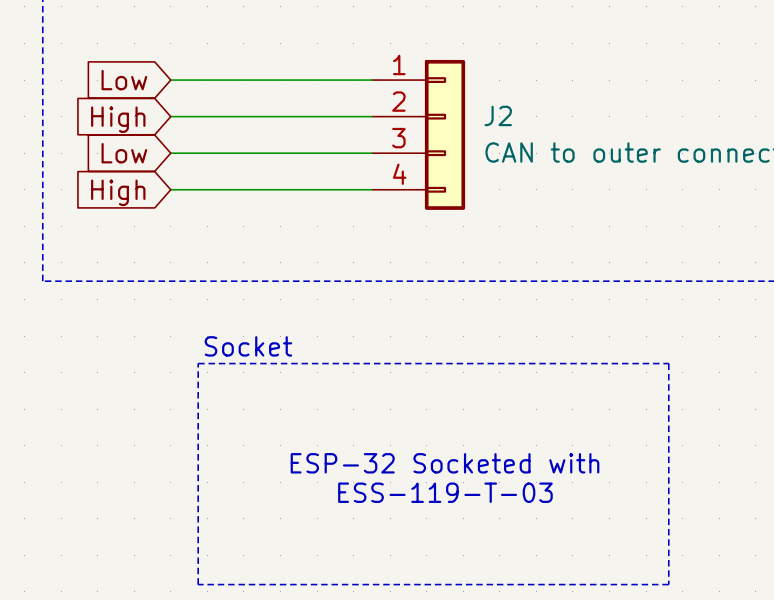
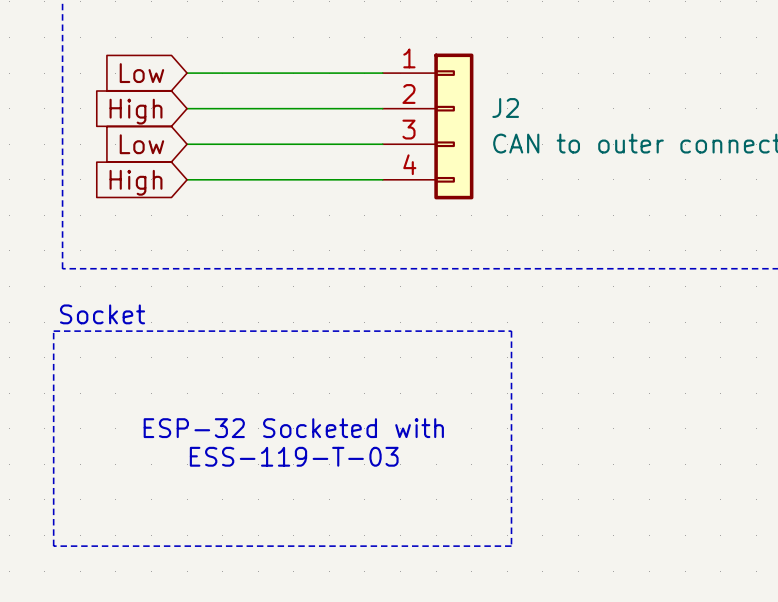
text position: Socket (248, 346) -> Socket (102, 314)
line: (198, 363) (668, 363) (668, 584) (198, 584) (198, 363) -> (53, 331) (511, 331) (511, 546) (53, 546) (53, 331)
text position: ESP-32 Socketed with (445, 463) -> ESP-32 Socketed with (293, 428)
text position: ESS-119-T-03 (445, 492) -> ESS-119-T-03 (294, 456)

